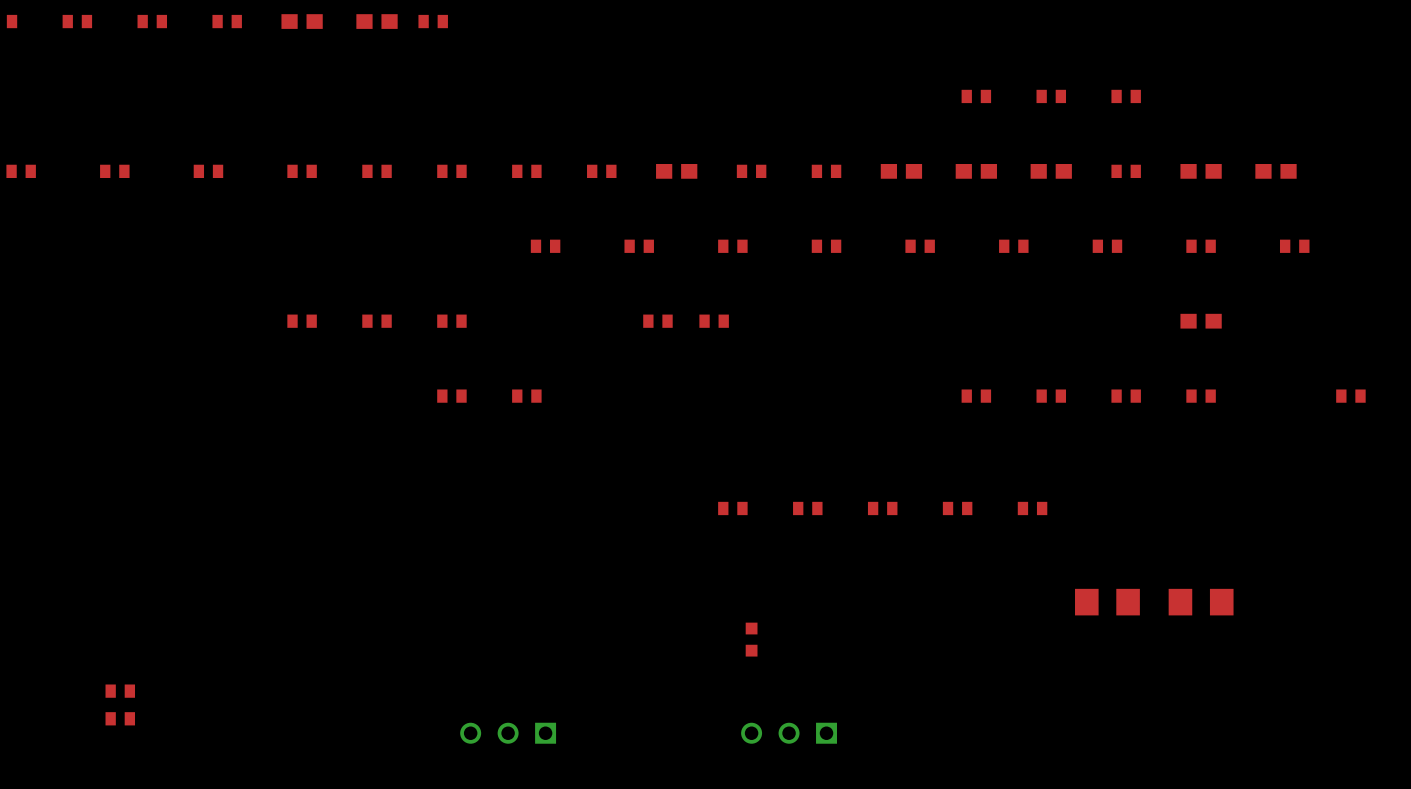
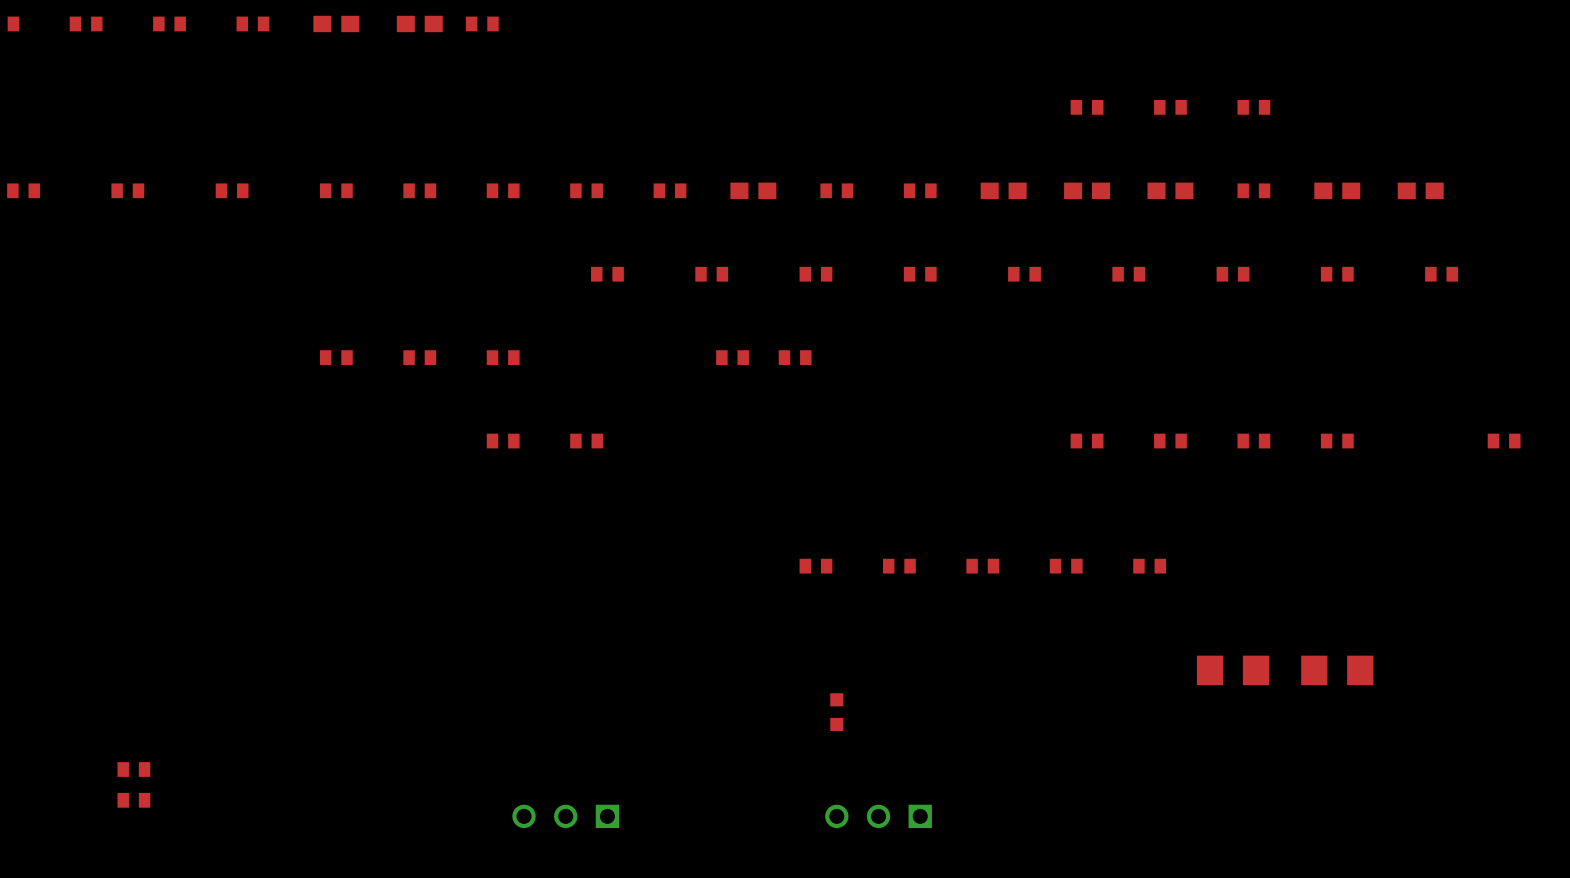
part: (1201, 321) -> none

